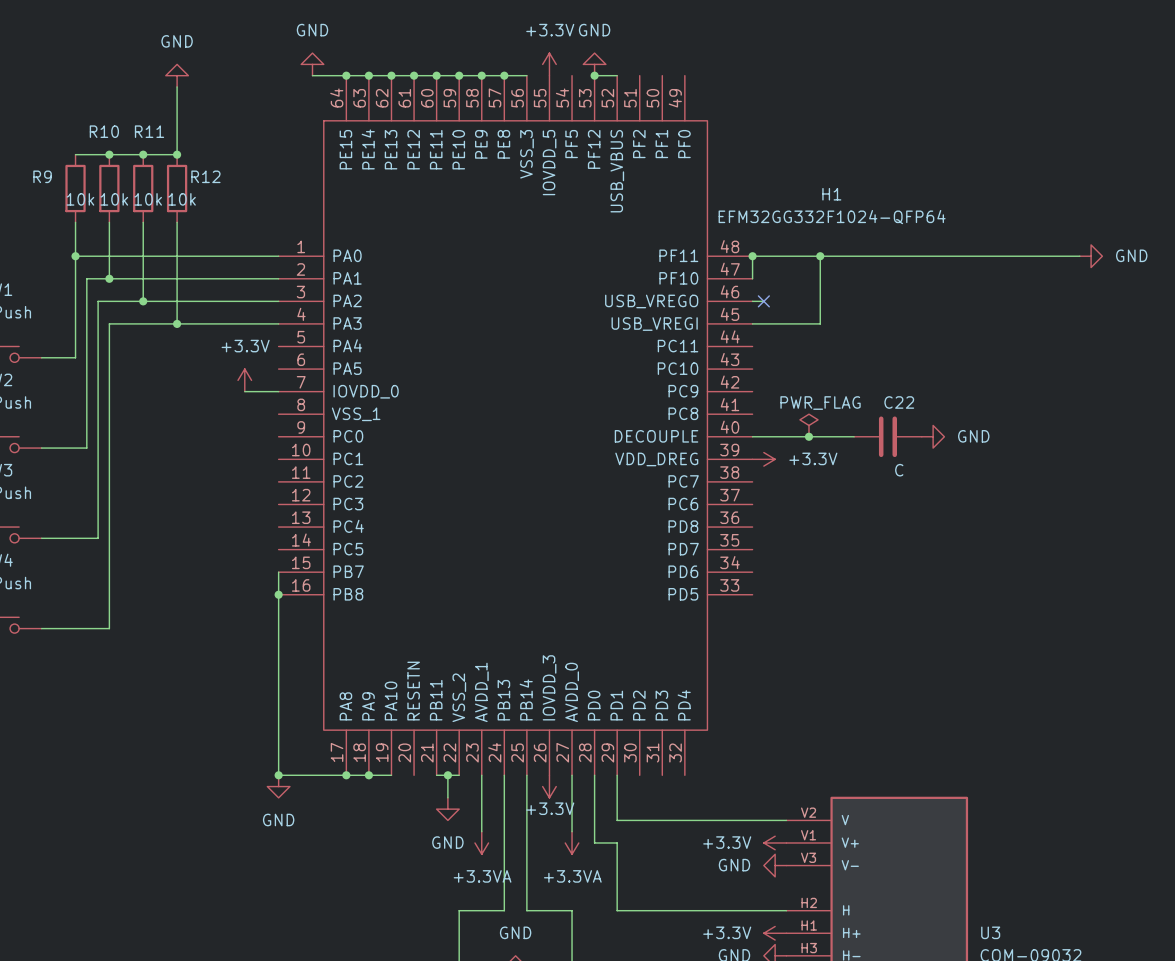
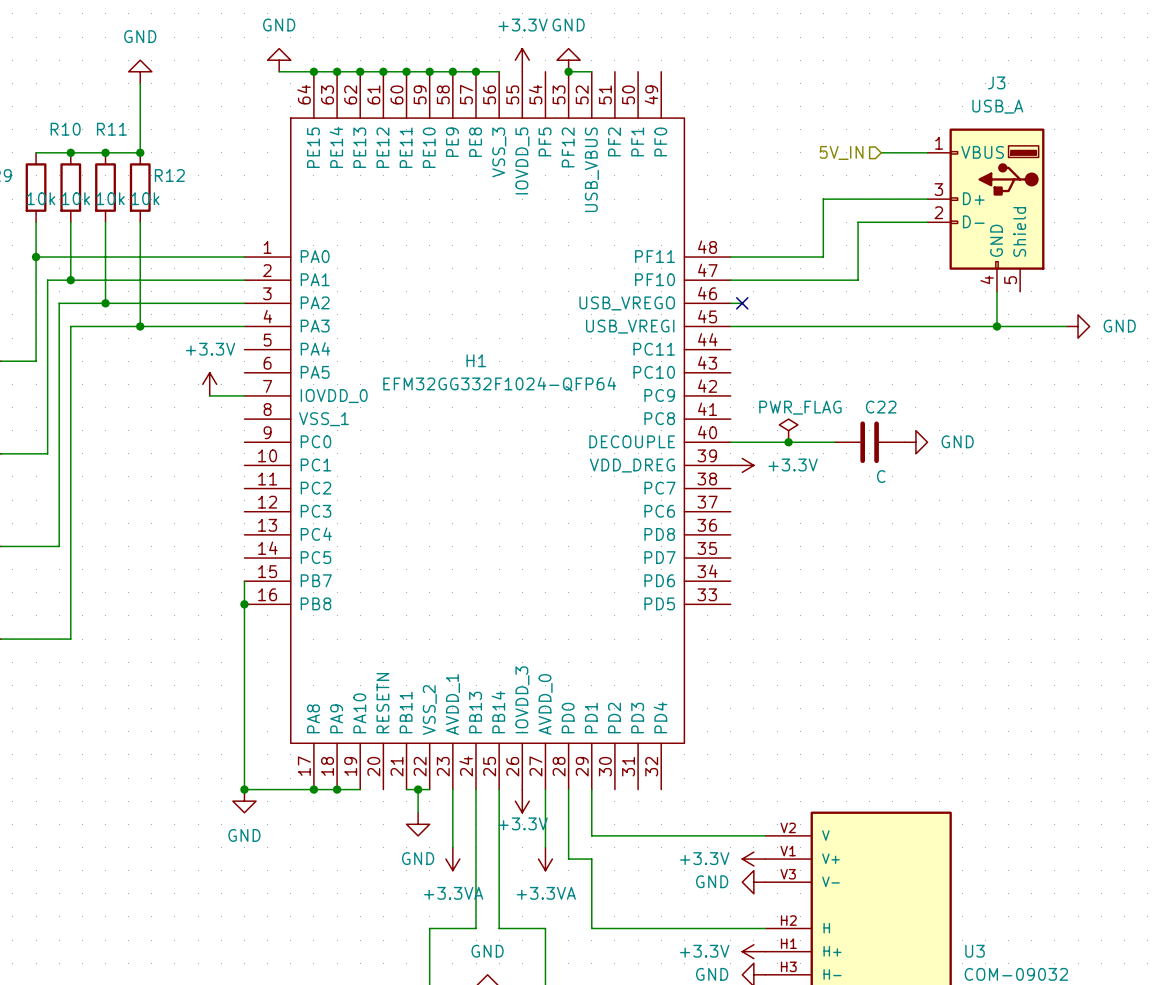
hierarchical label: none -> 5V_IN (841, 152)
wire: none -> (881, 152) (927, 152)
H1 name position: H1 (831, 194) -> H1 (476, 360)
J3: none -> USB_A (985, 210)
H1 value position: EFM32GG332F1024-QFP64 (832, 217) -> EFM32GG332F1024-QFP64 (499, 384)
wire: (752, 256) (752, 278) -> (927, 222) (858, 222) (858, 280) (730, 280)
junction: (752, 256) -> none
wire: (820, 256) (820, 323) -> (1066, 326) (800, 326)
junction: (820, 256) -> none
wire: (842, 256) (1079, 256) -> (823, 257) (823, 199) (927, 199)
power symbol position: GND (1091, 256) -> GND (1078, 326)
wire: none -> (996, 291) (996, 326)
junction: none -> (996, 326)

